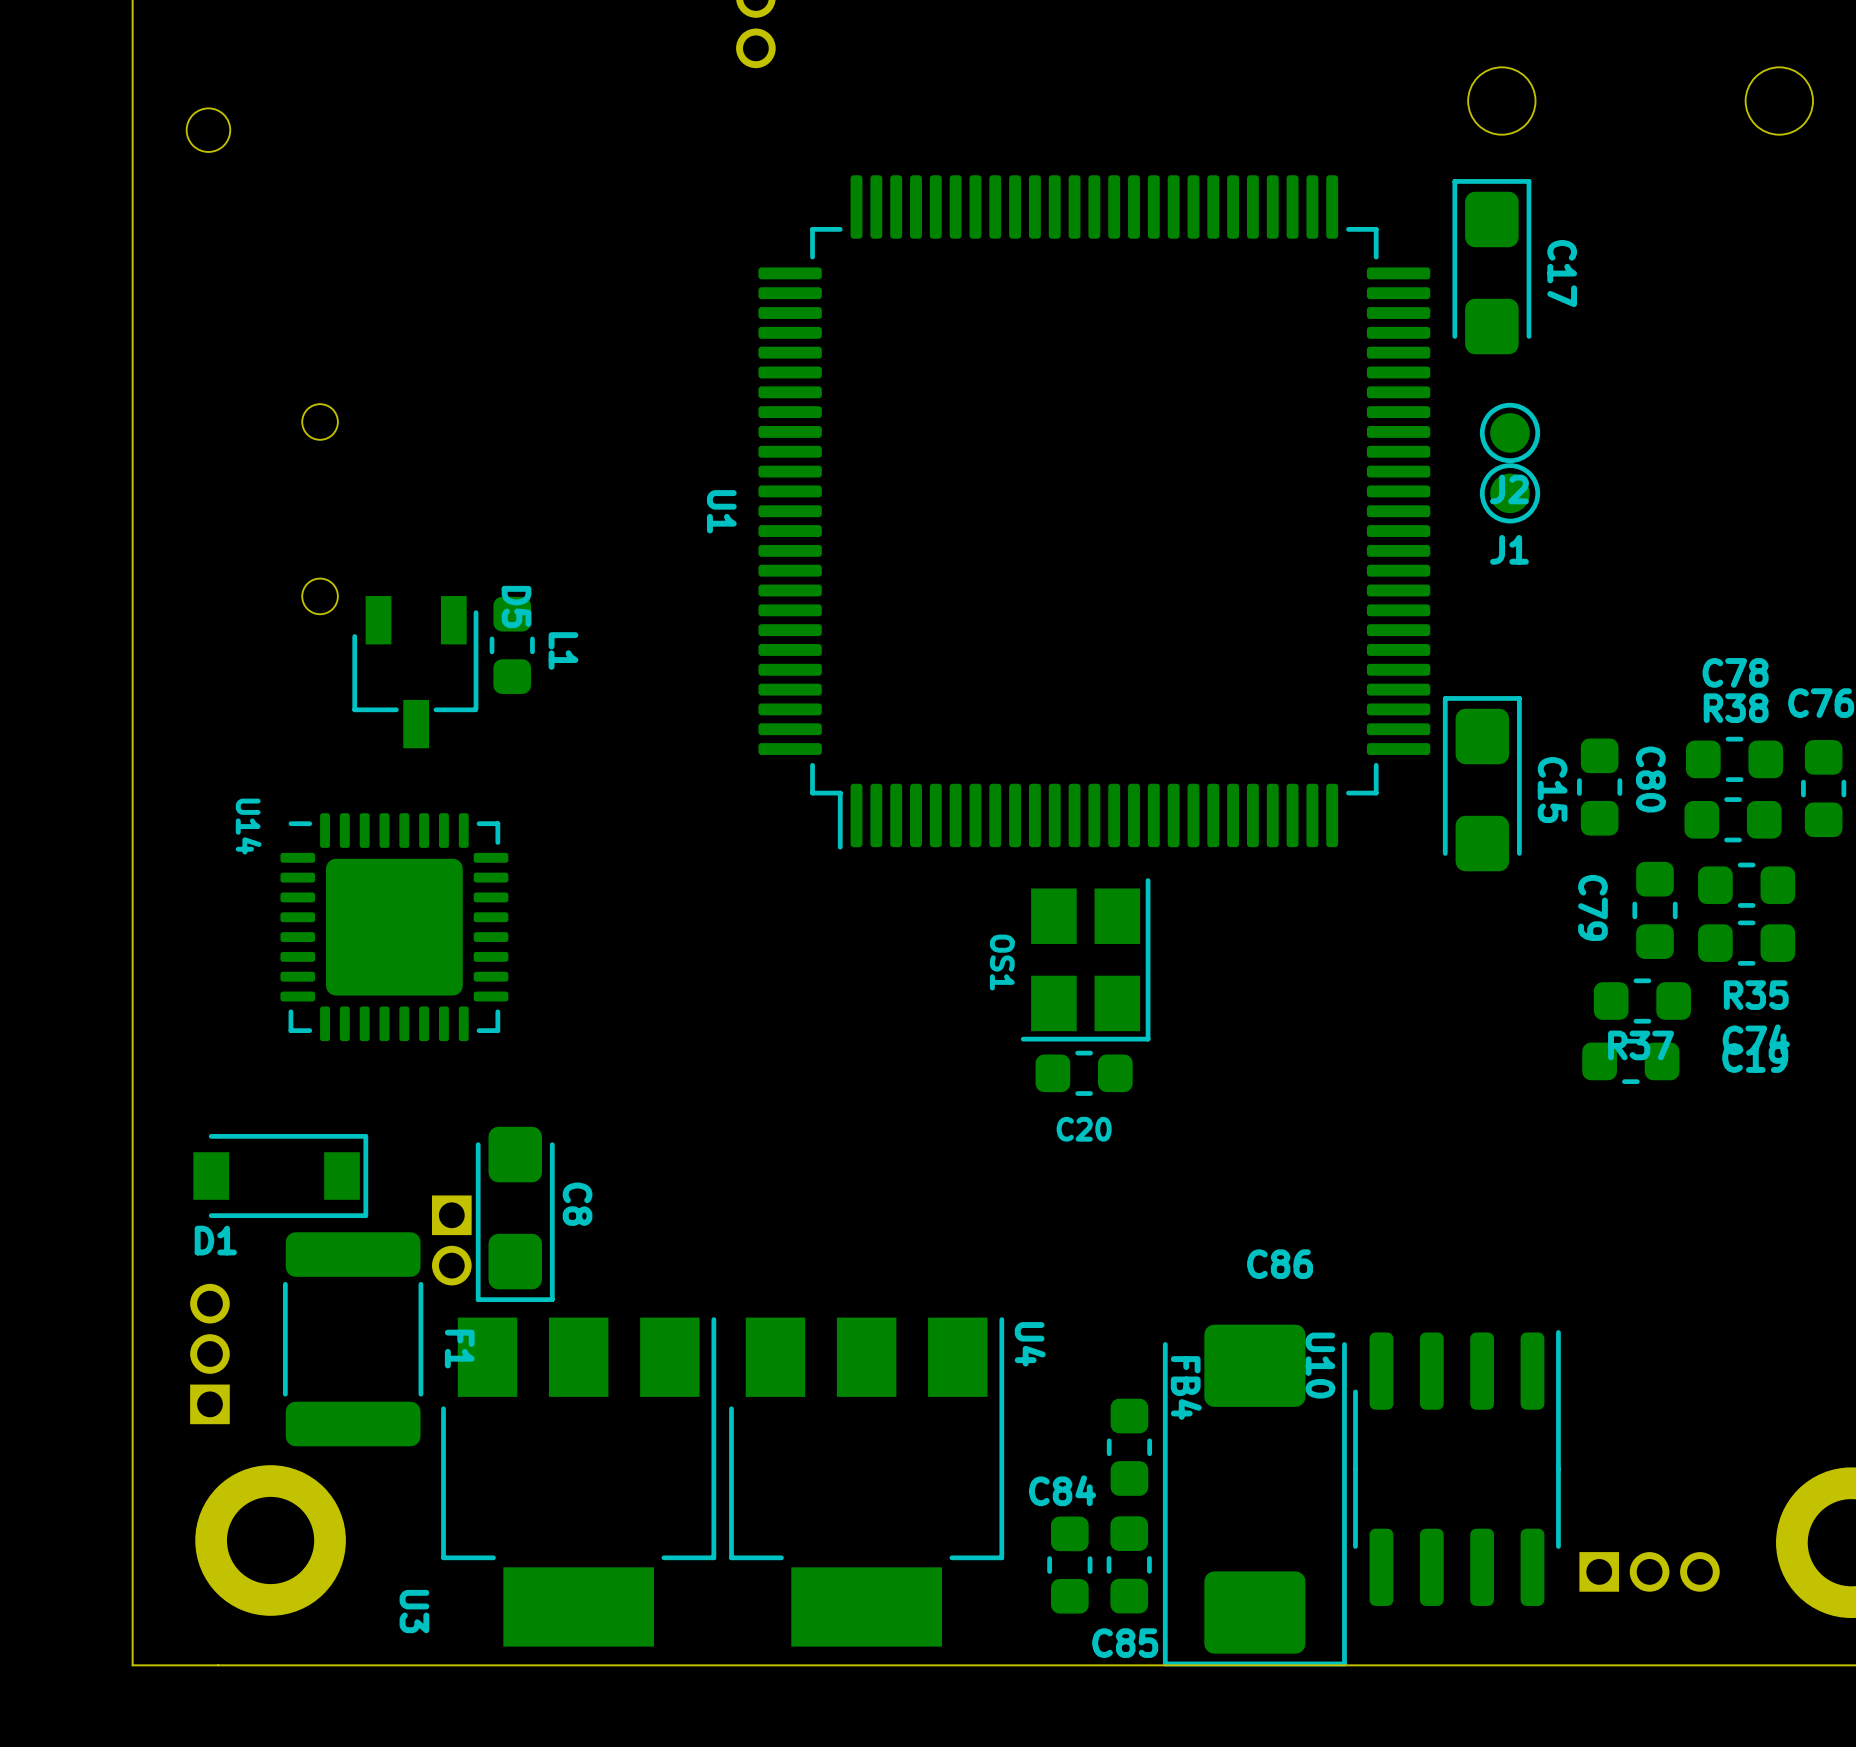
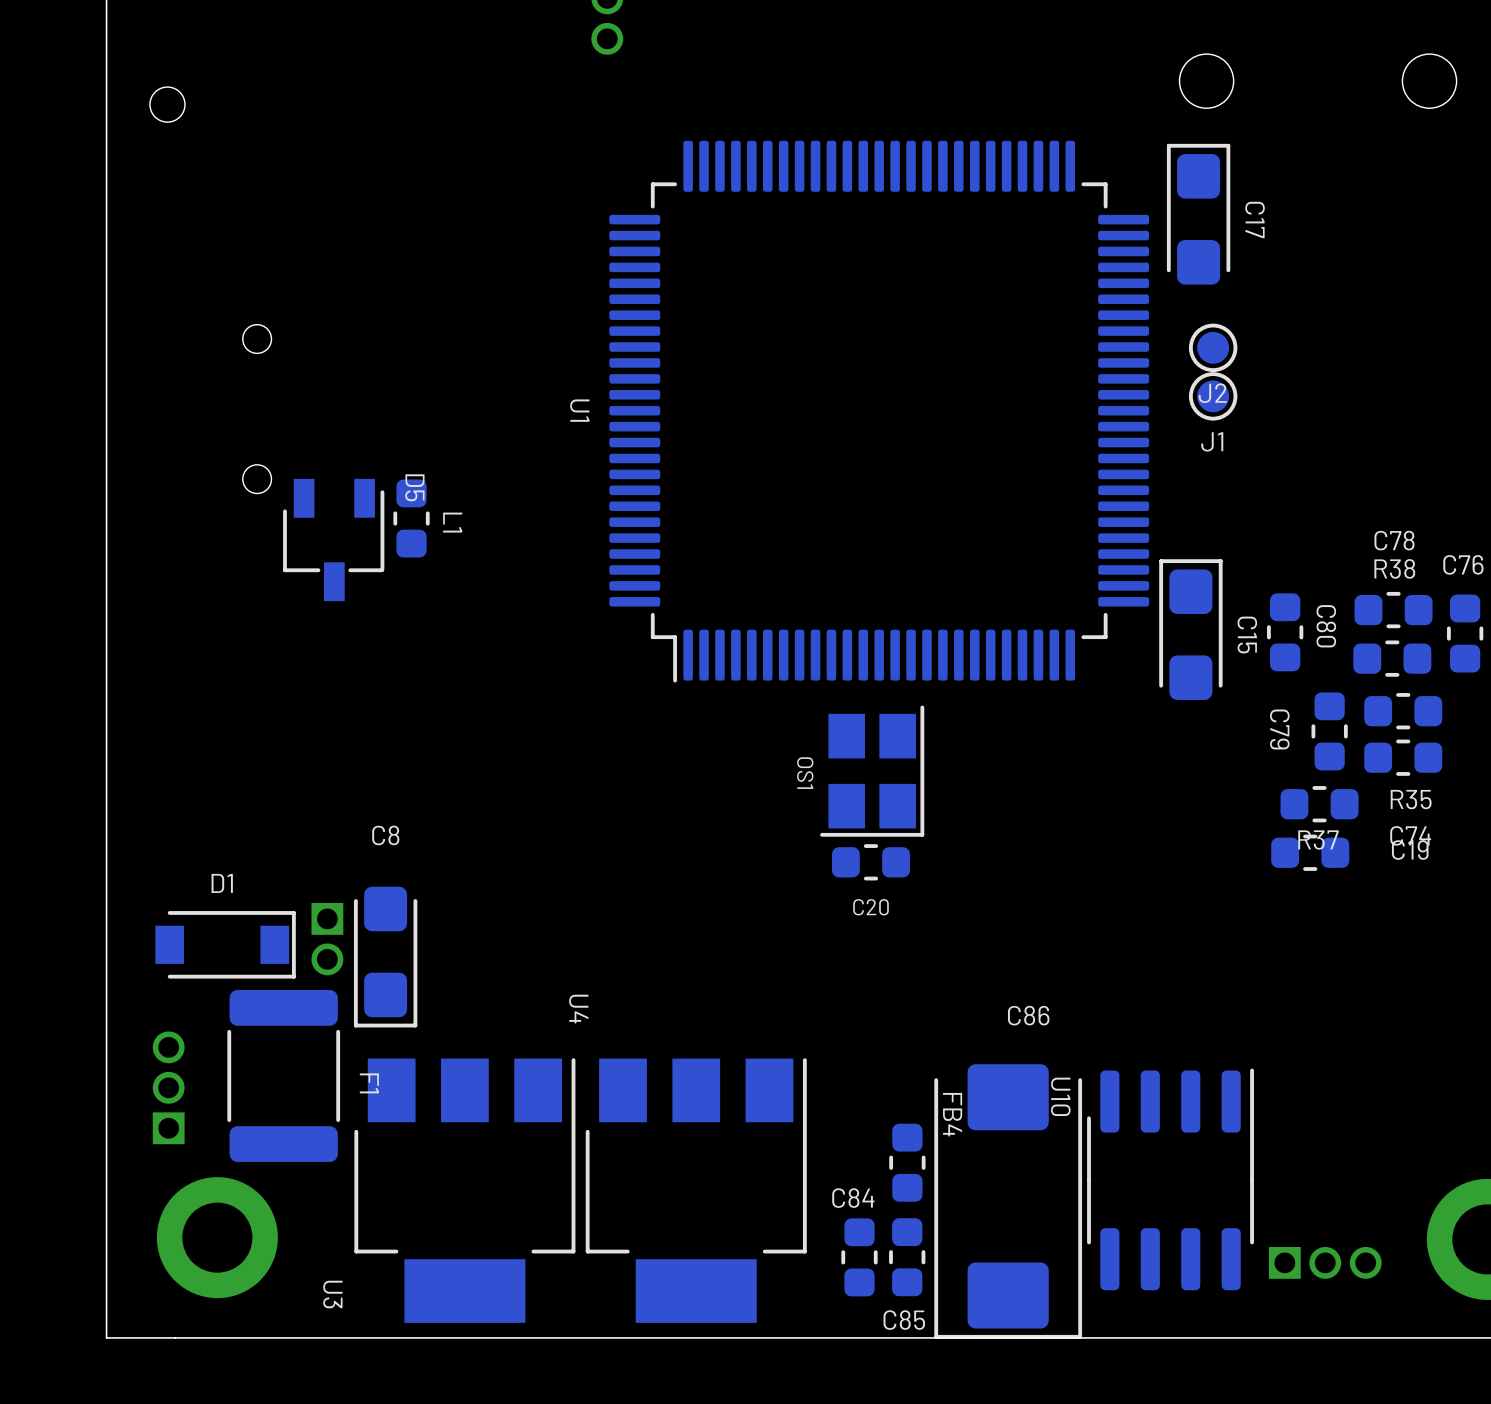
U14: (394, 927) -> none
C8 name rotation: 0° (577, 1204) -> 90° counterclockwise (385, 835)
C8 name position: C8 (577, 1204) -> C8 (385, 835)
C8 position: (515, 1214) -> (385, 957)
D1 name position: D1 (215, 1240) -> D1 (222, 883)
part position: (451, 1240) -> (327, 939)
U4 name position: U4 (1030, 1344) -> U4 (578, 1009)

